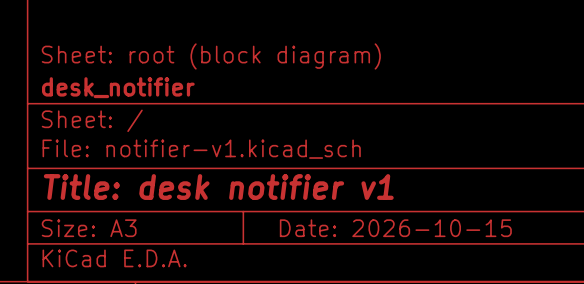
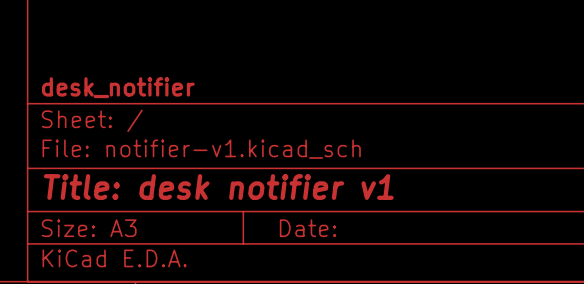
title block: Sheet: root (block diagram) (211, 56) -> none
title block: Date: 2026-10-15 (395, 228) -> Date: (307, 228)

